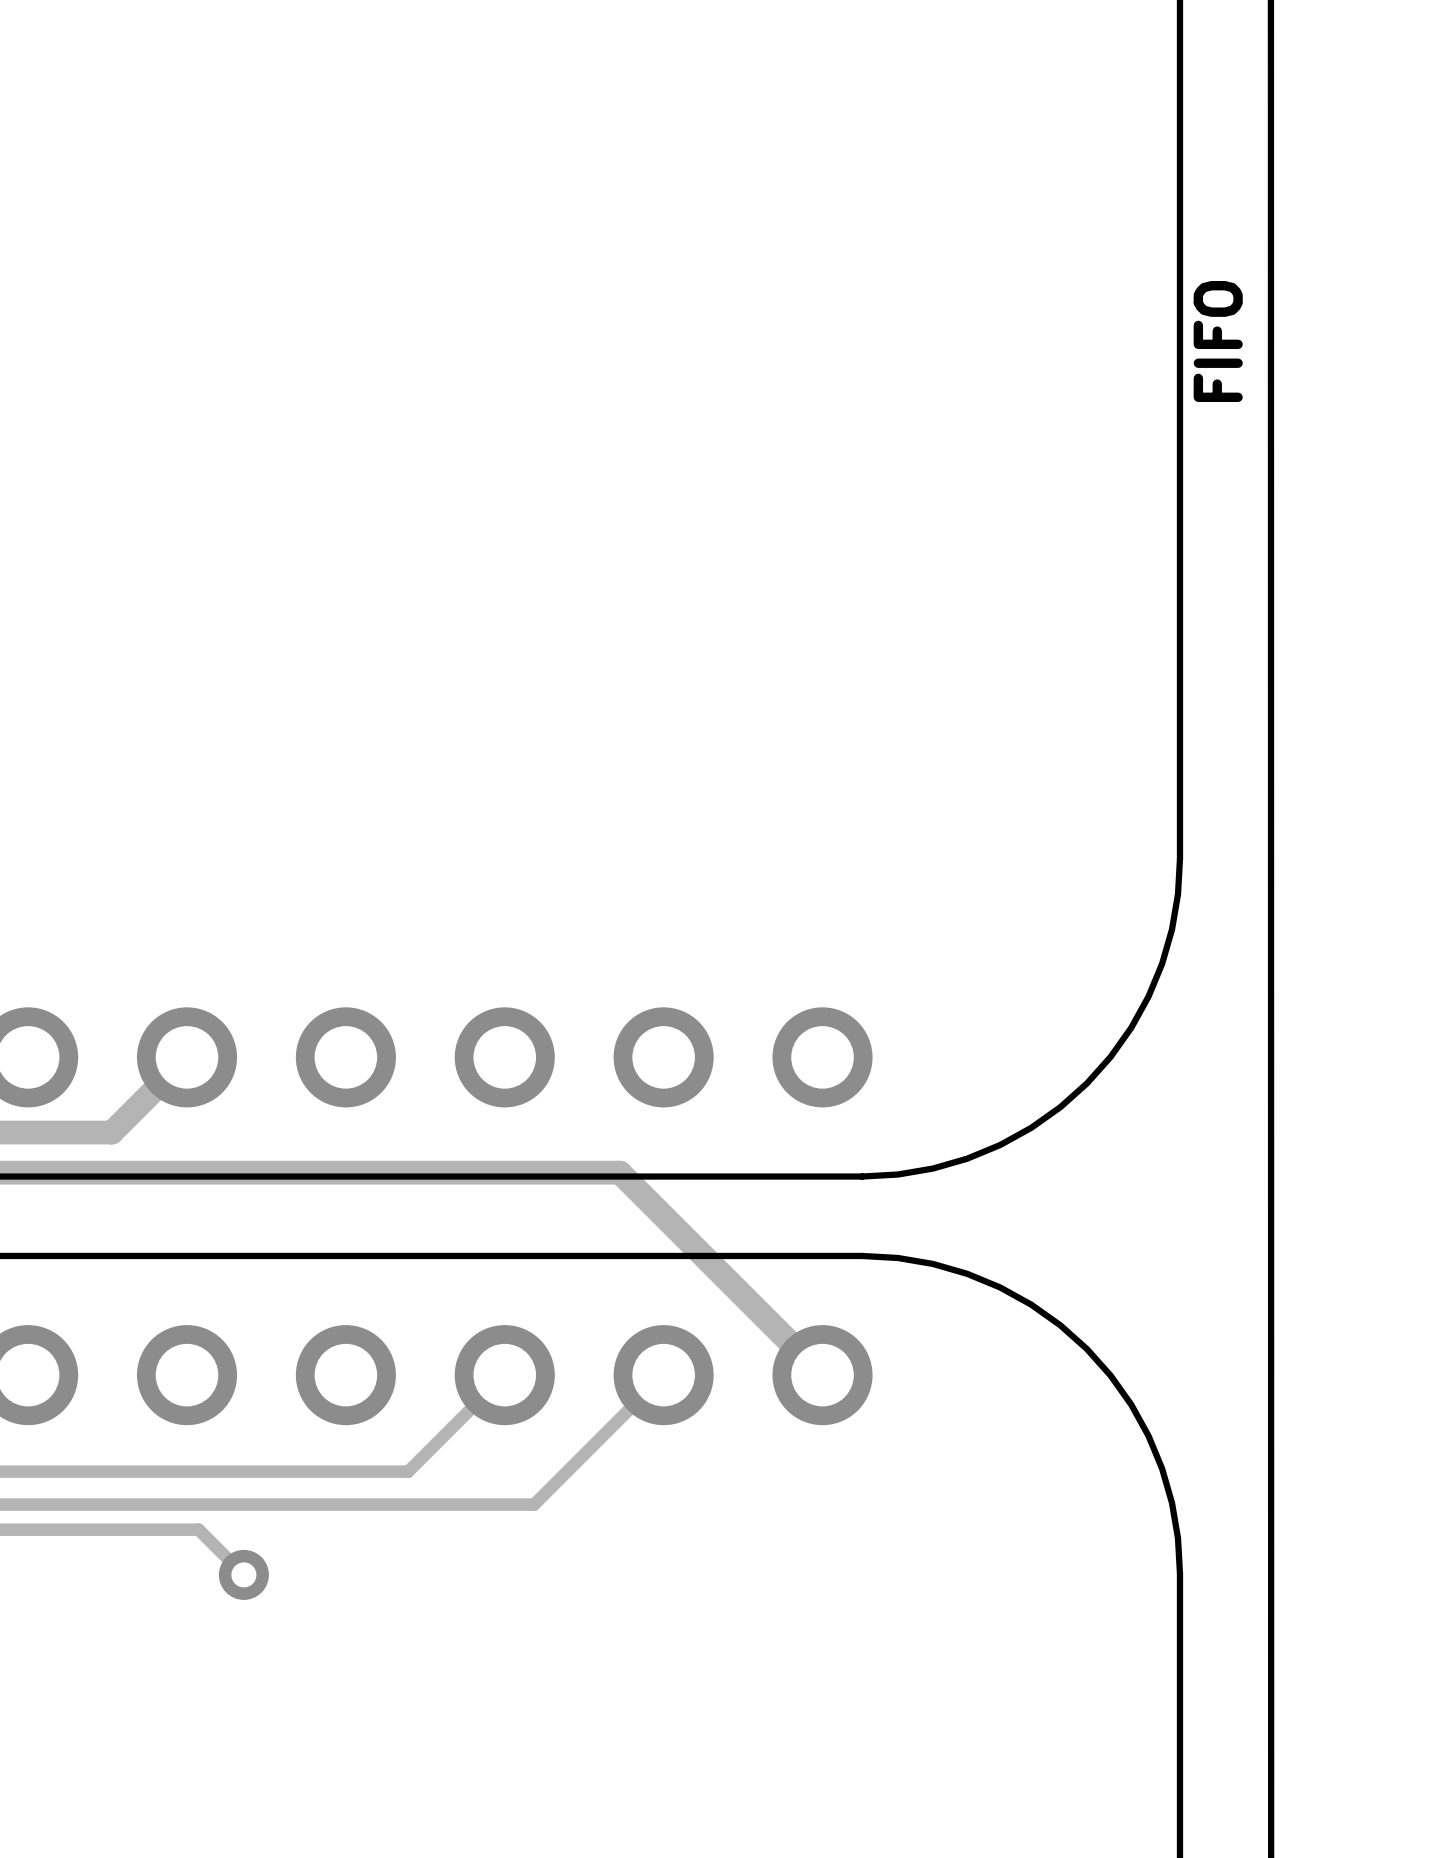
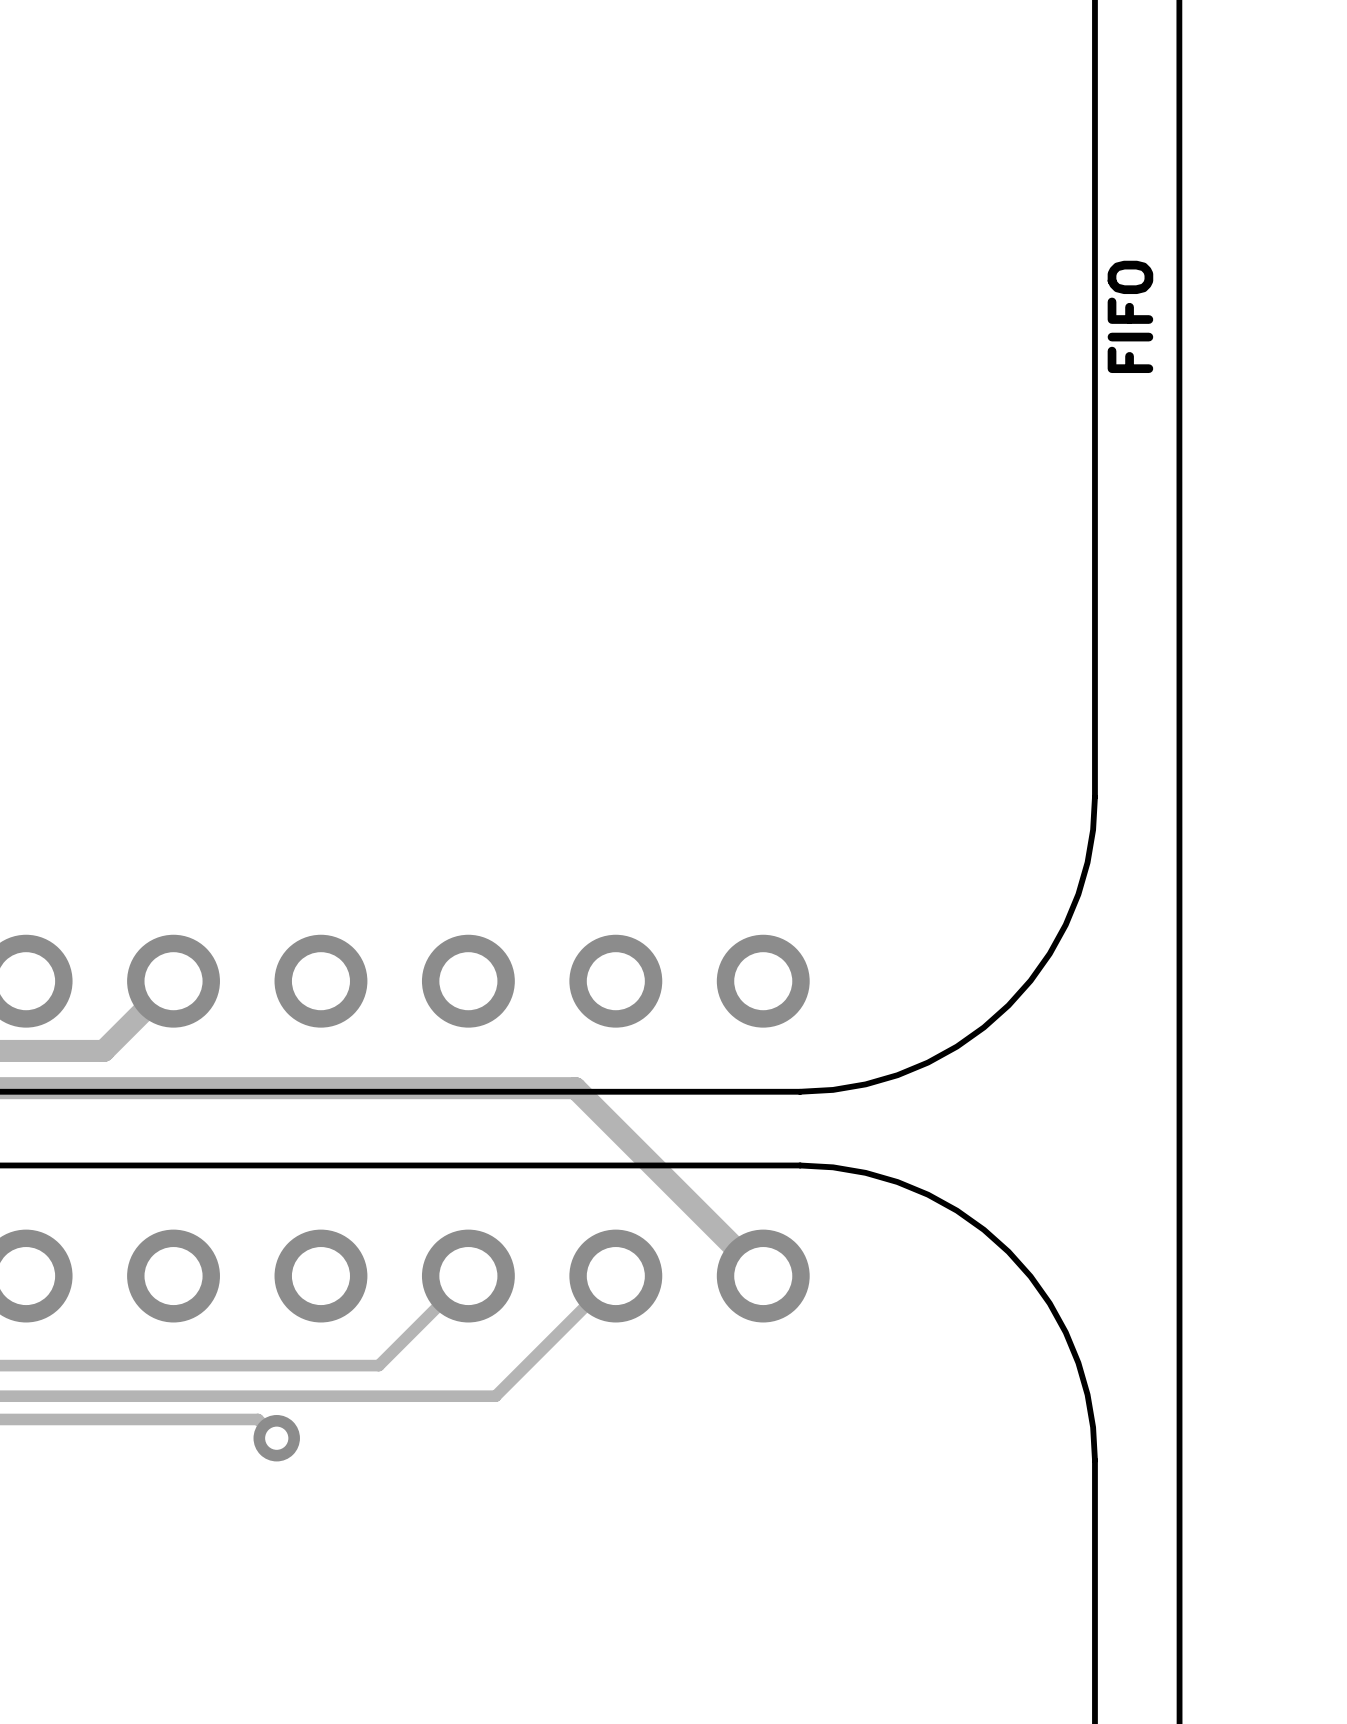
track: (198, 1529) (243, 1574) -> (184, 1419) (257, 1419) (276, 1438)
via position: (243, 1574) -> (276, 1438)

